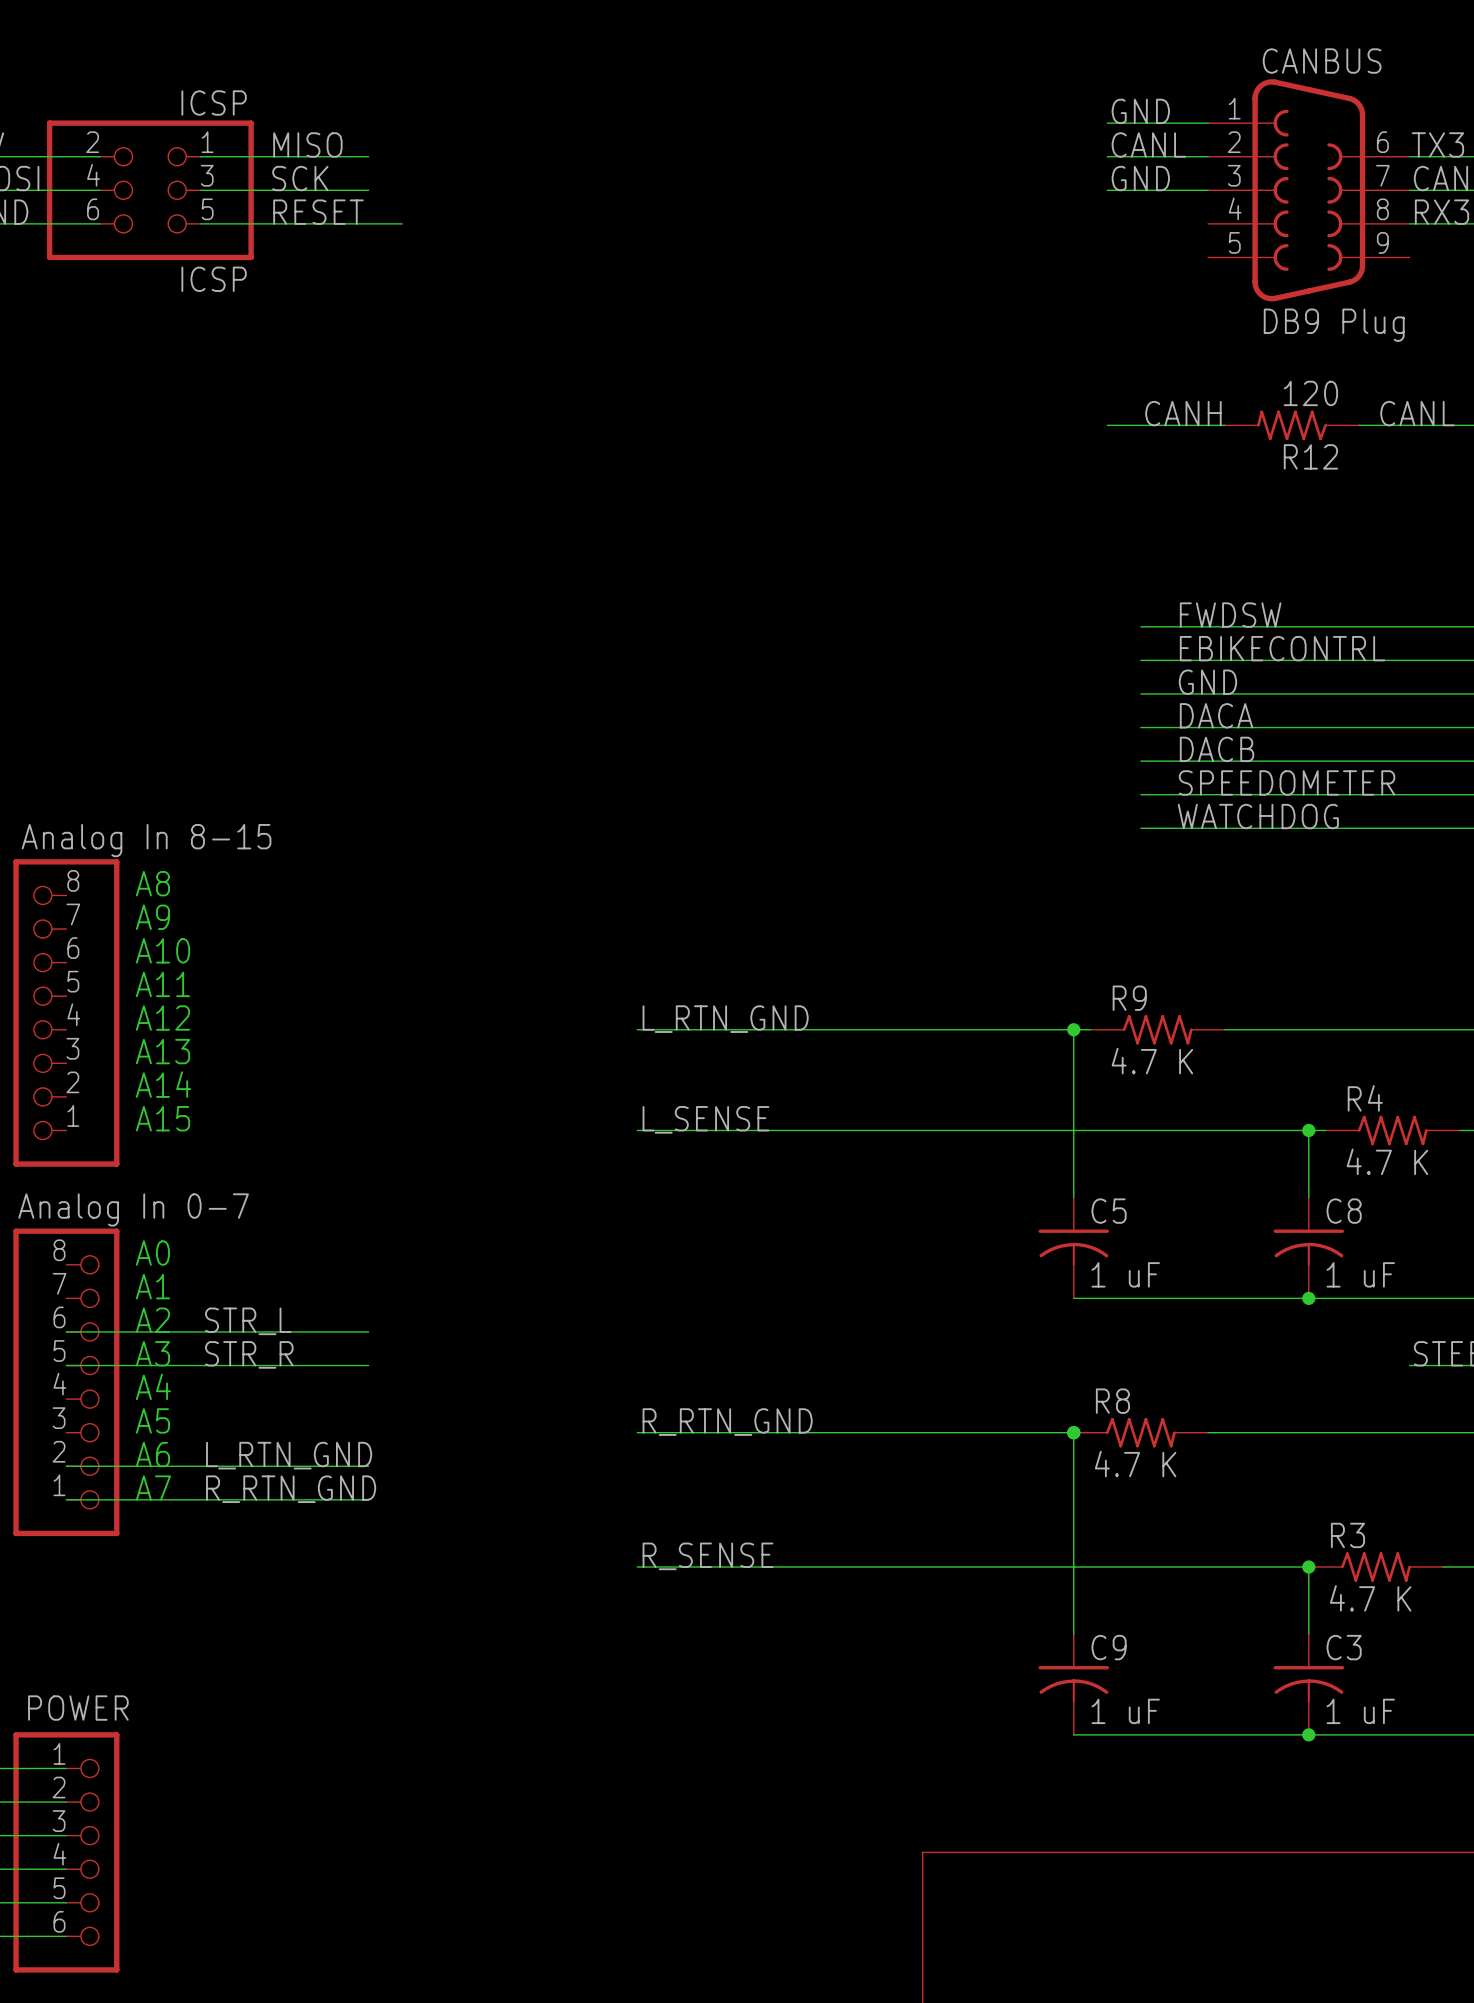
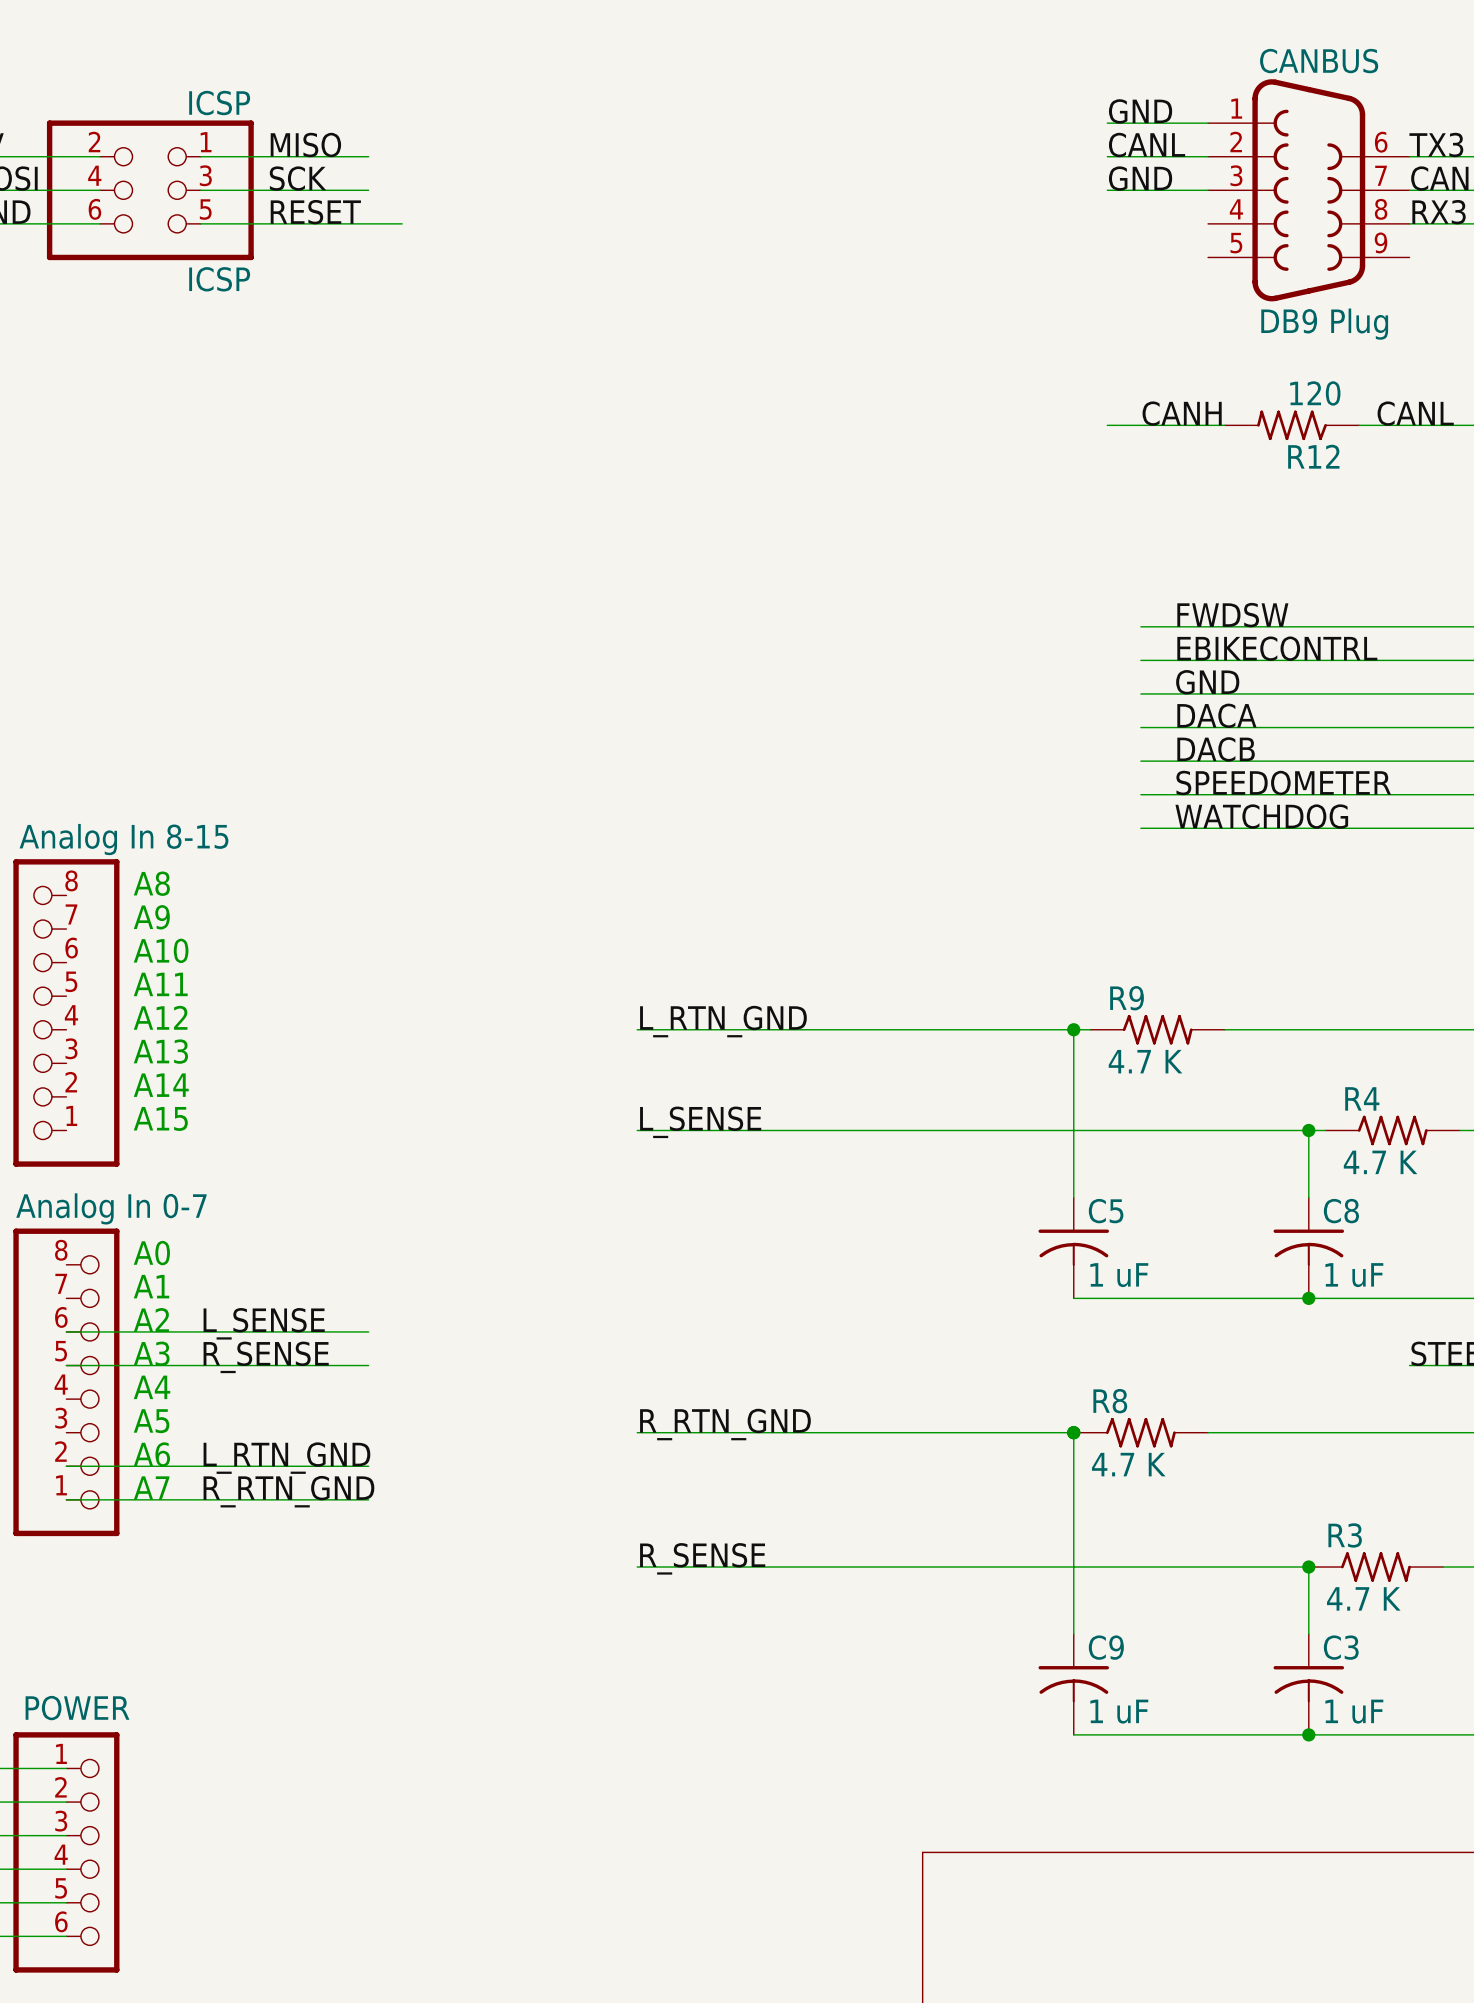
label: STR_L (248, 1321) -> L_SENSE (264, 1323)
label: STR_R (249, 1354) -> R_SENSE (266, 1357)

